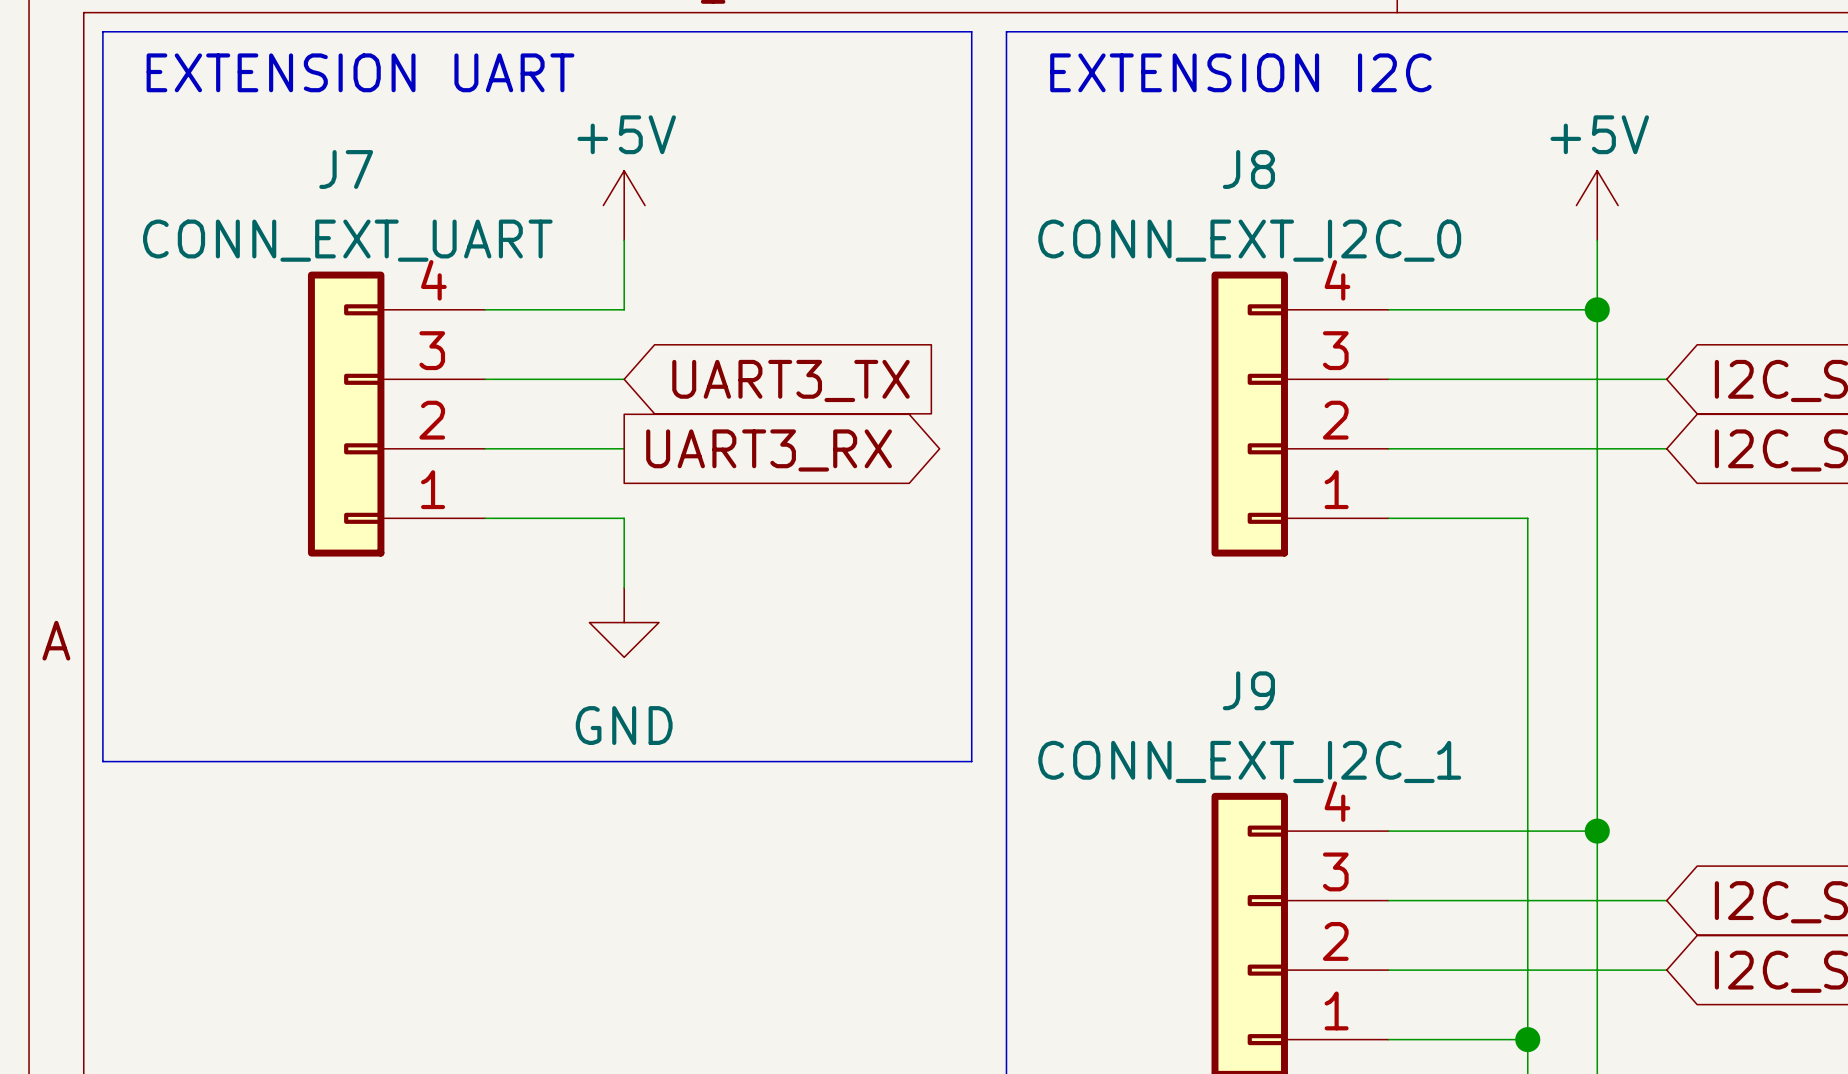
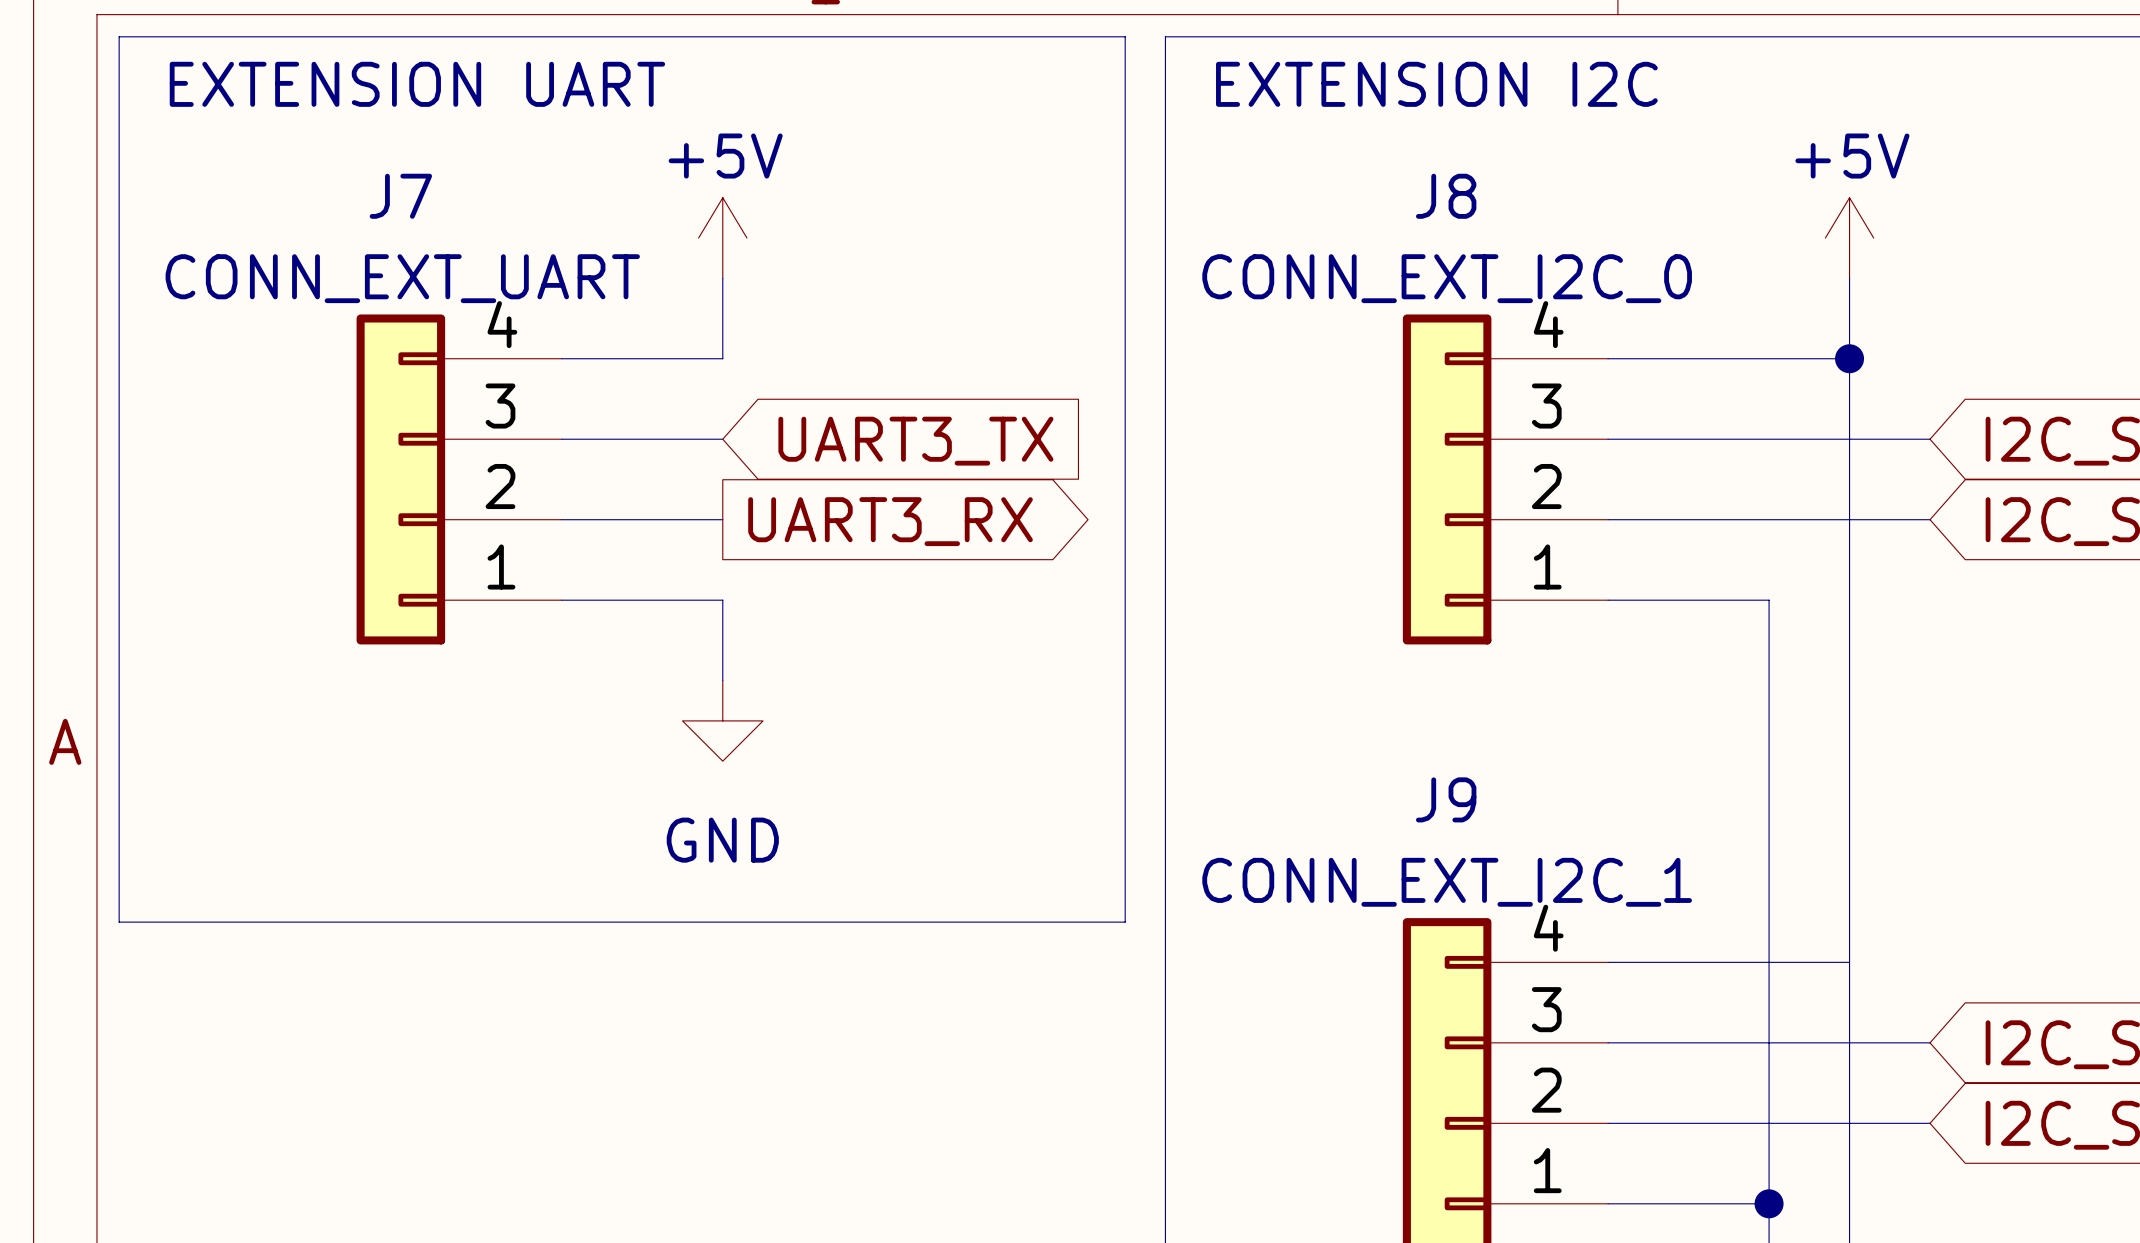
line: (102, 761) (971, 761) -> (119, 881) (119, 922) (1125, 922) (1125, 881)
junction: (1597, 831) -> none

